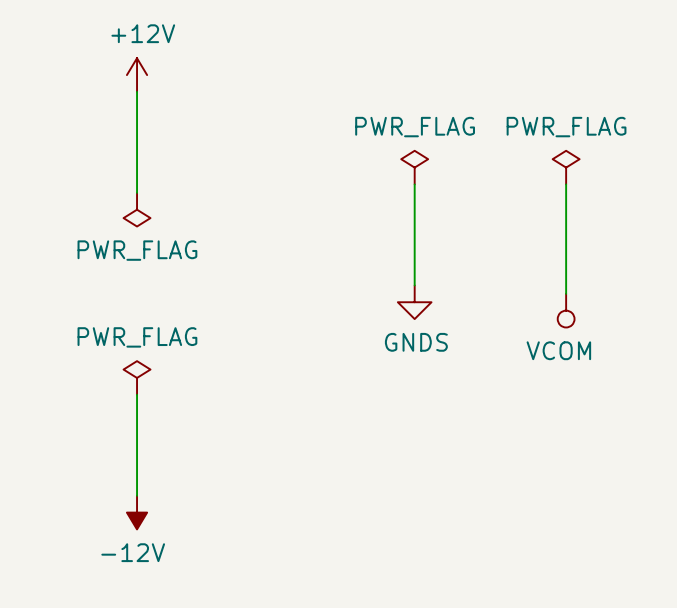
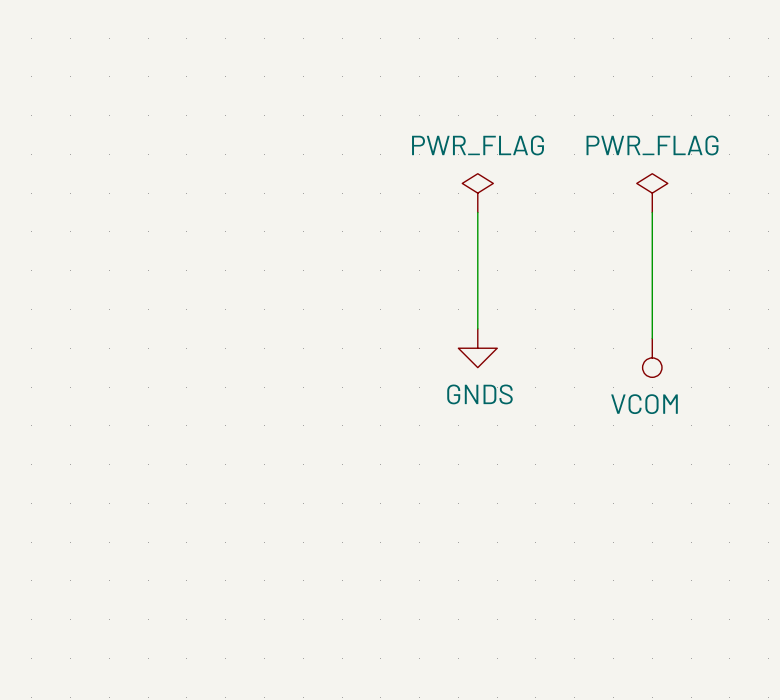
power symbol: +12V (137, 75) -> none
wire: (137, 91) (137, 192) -> none
power symbol: PWR_FLAG (137, 209) -> none
power symbol: PWR_FLAG (137, 377) -> none
wire: (137, 394) (137, 495) -> none
power symbol: -12V (137, 512) -> none

